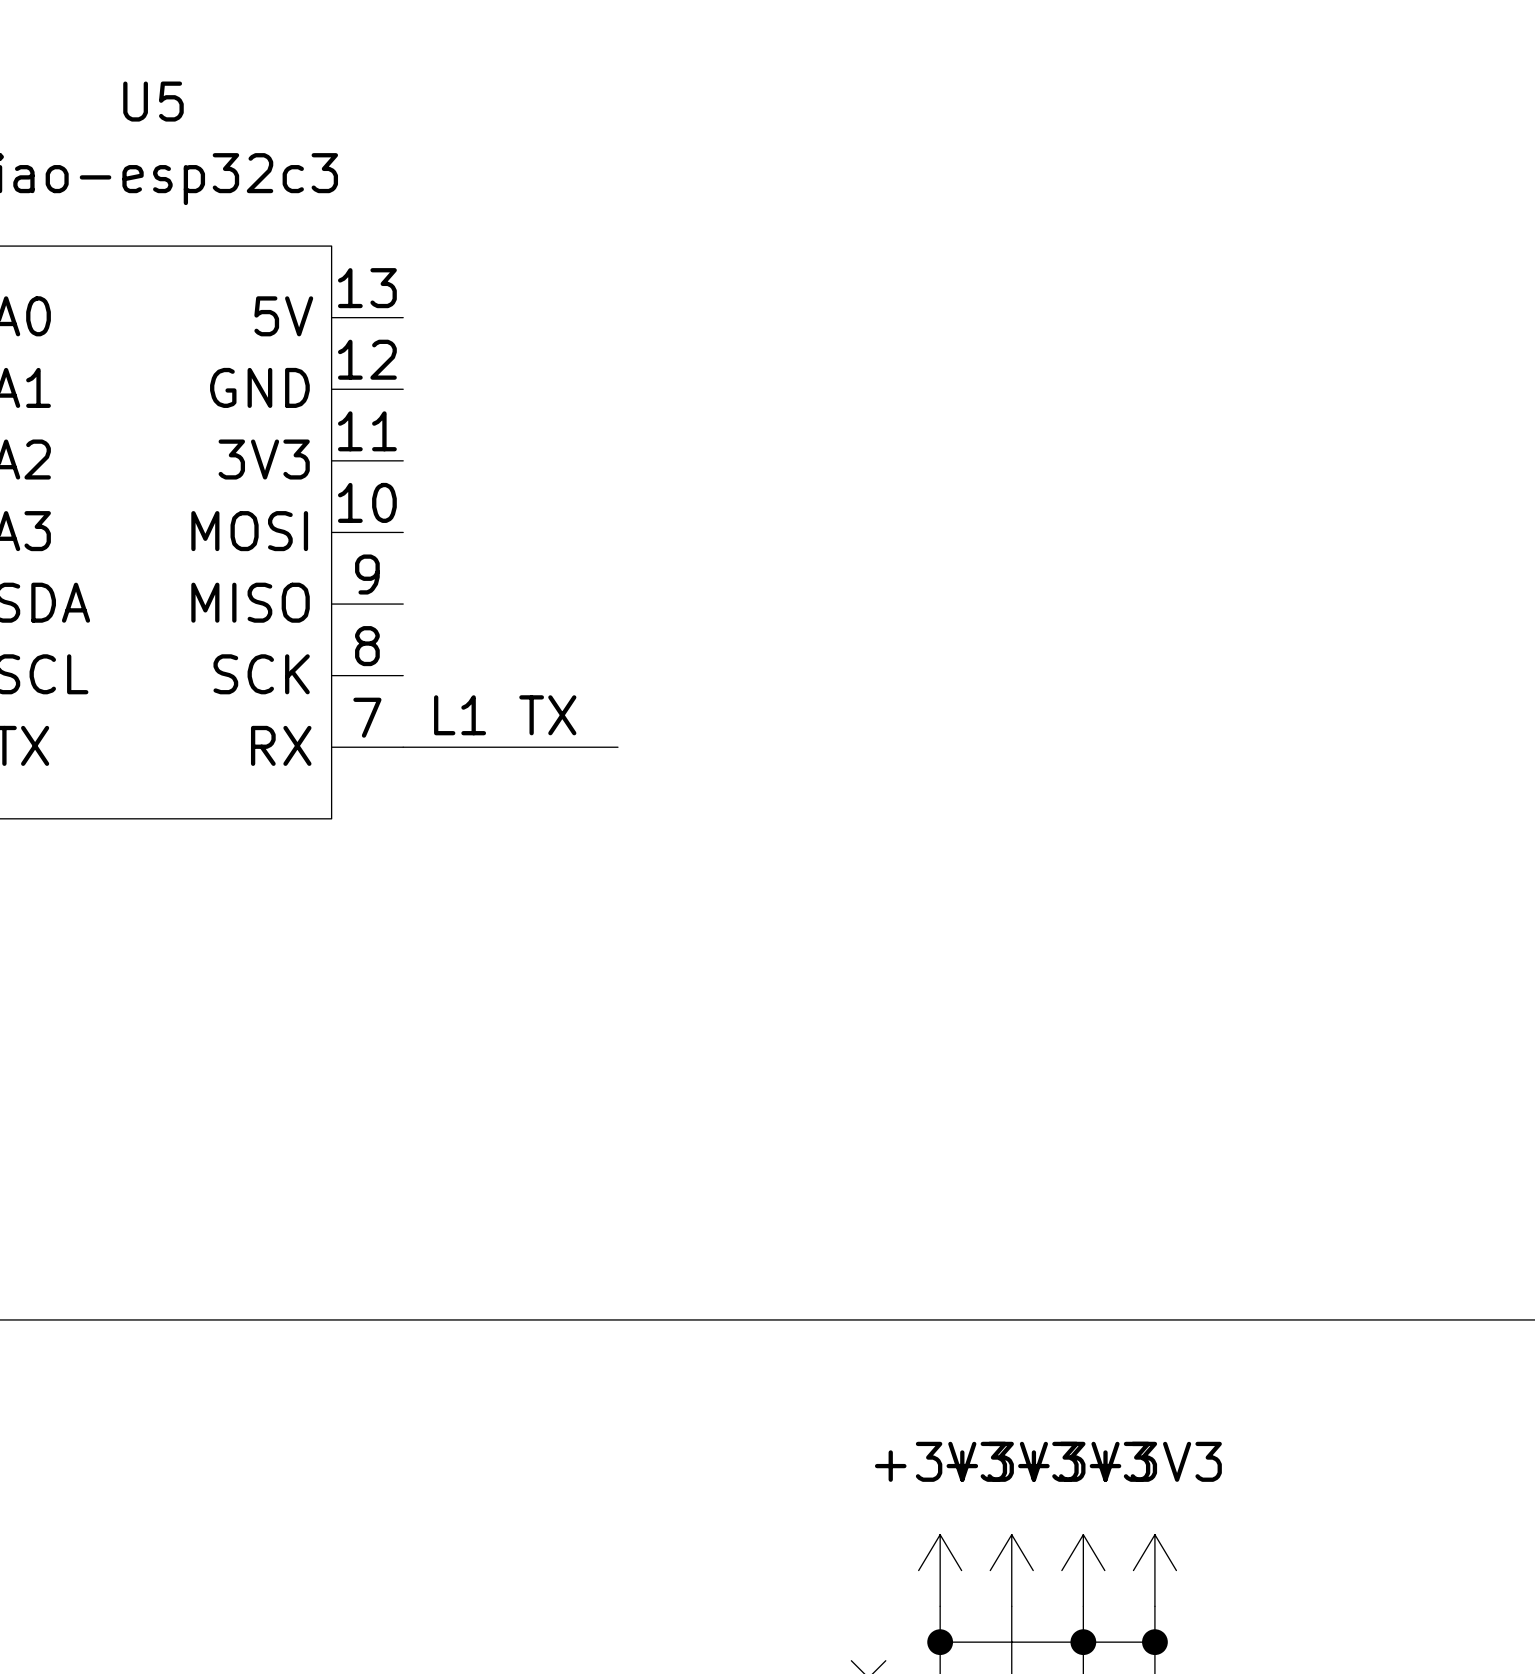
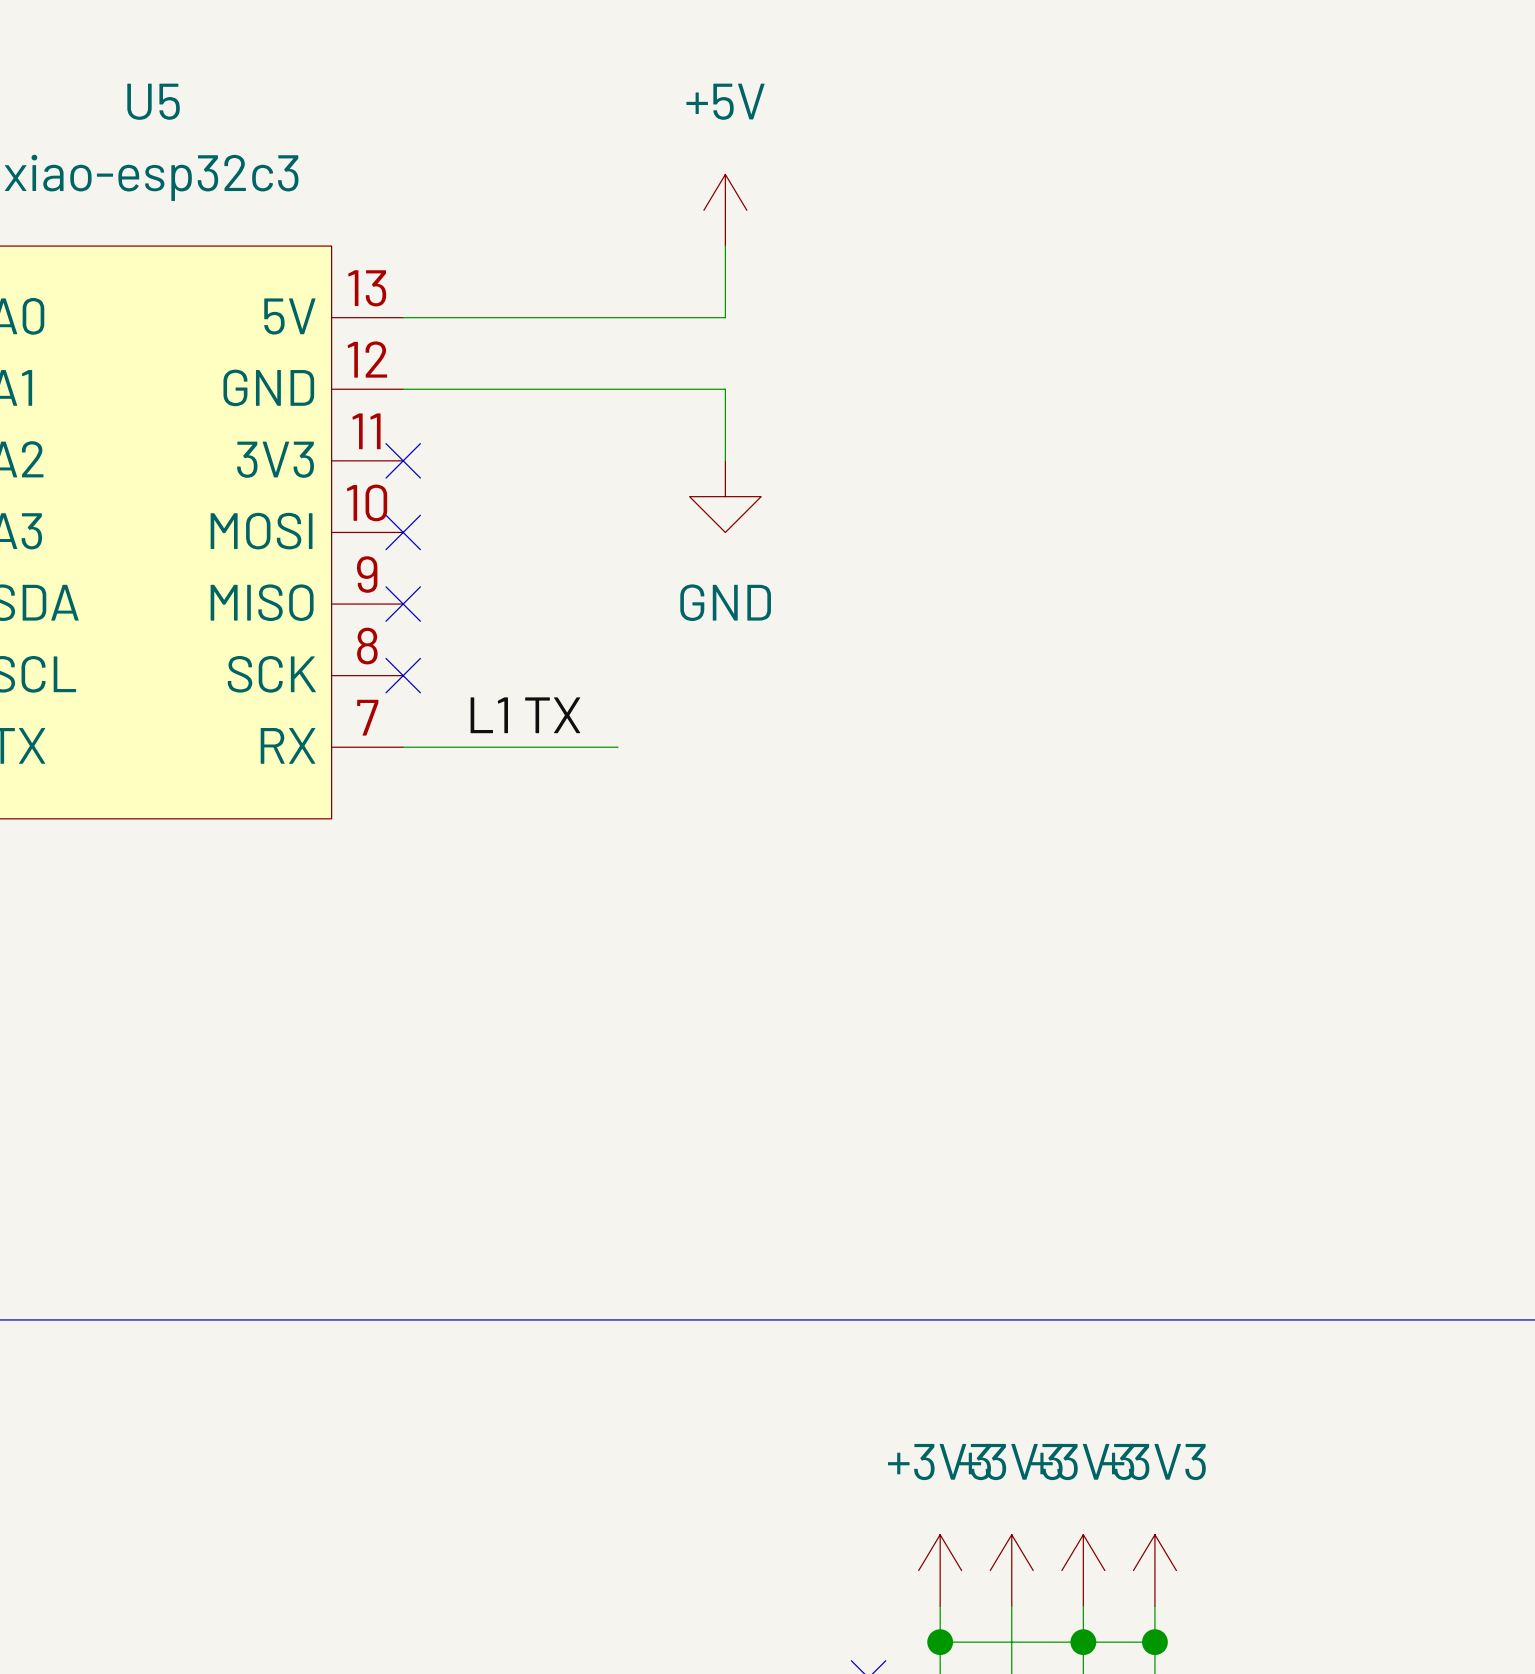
power symbol: none -> +5V (725, 210)
wire: none -> (725, 246) (725, 317) (403, 317)
wire: none -> (403, 389) (725, 389) (725, 460)
no-connect mark: none -> (403, 460)
power symbol: none -> GND (725, 496)
no-connect mark: none -> (403, 532)
no-connect mark: none -> (403, 604)
no-connect mark: none -> (403, 675)

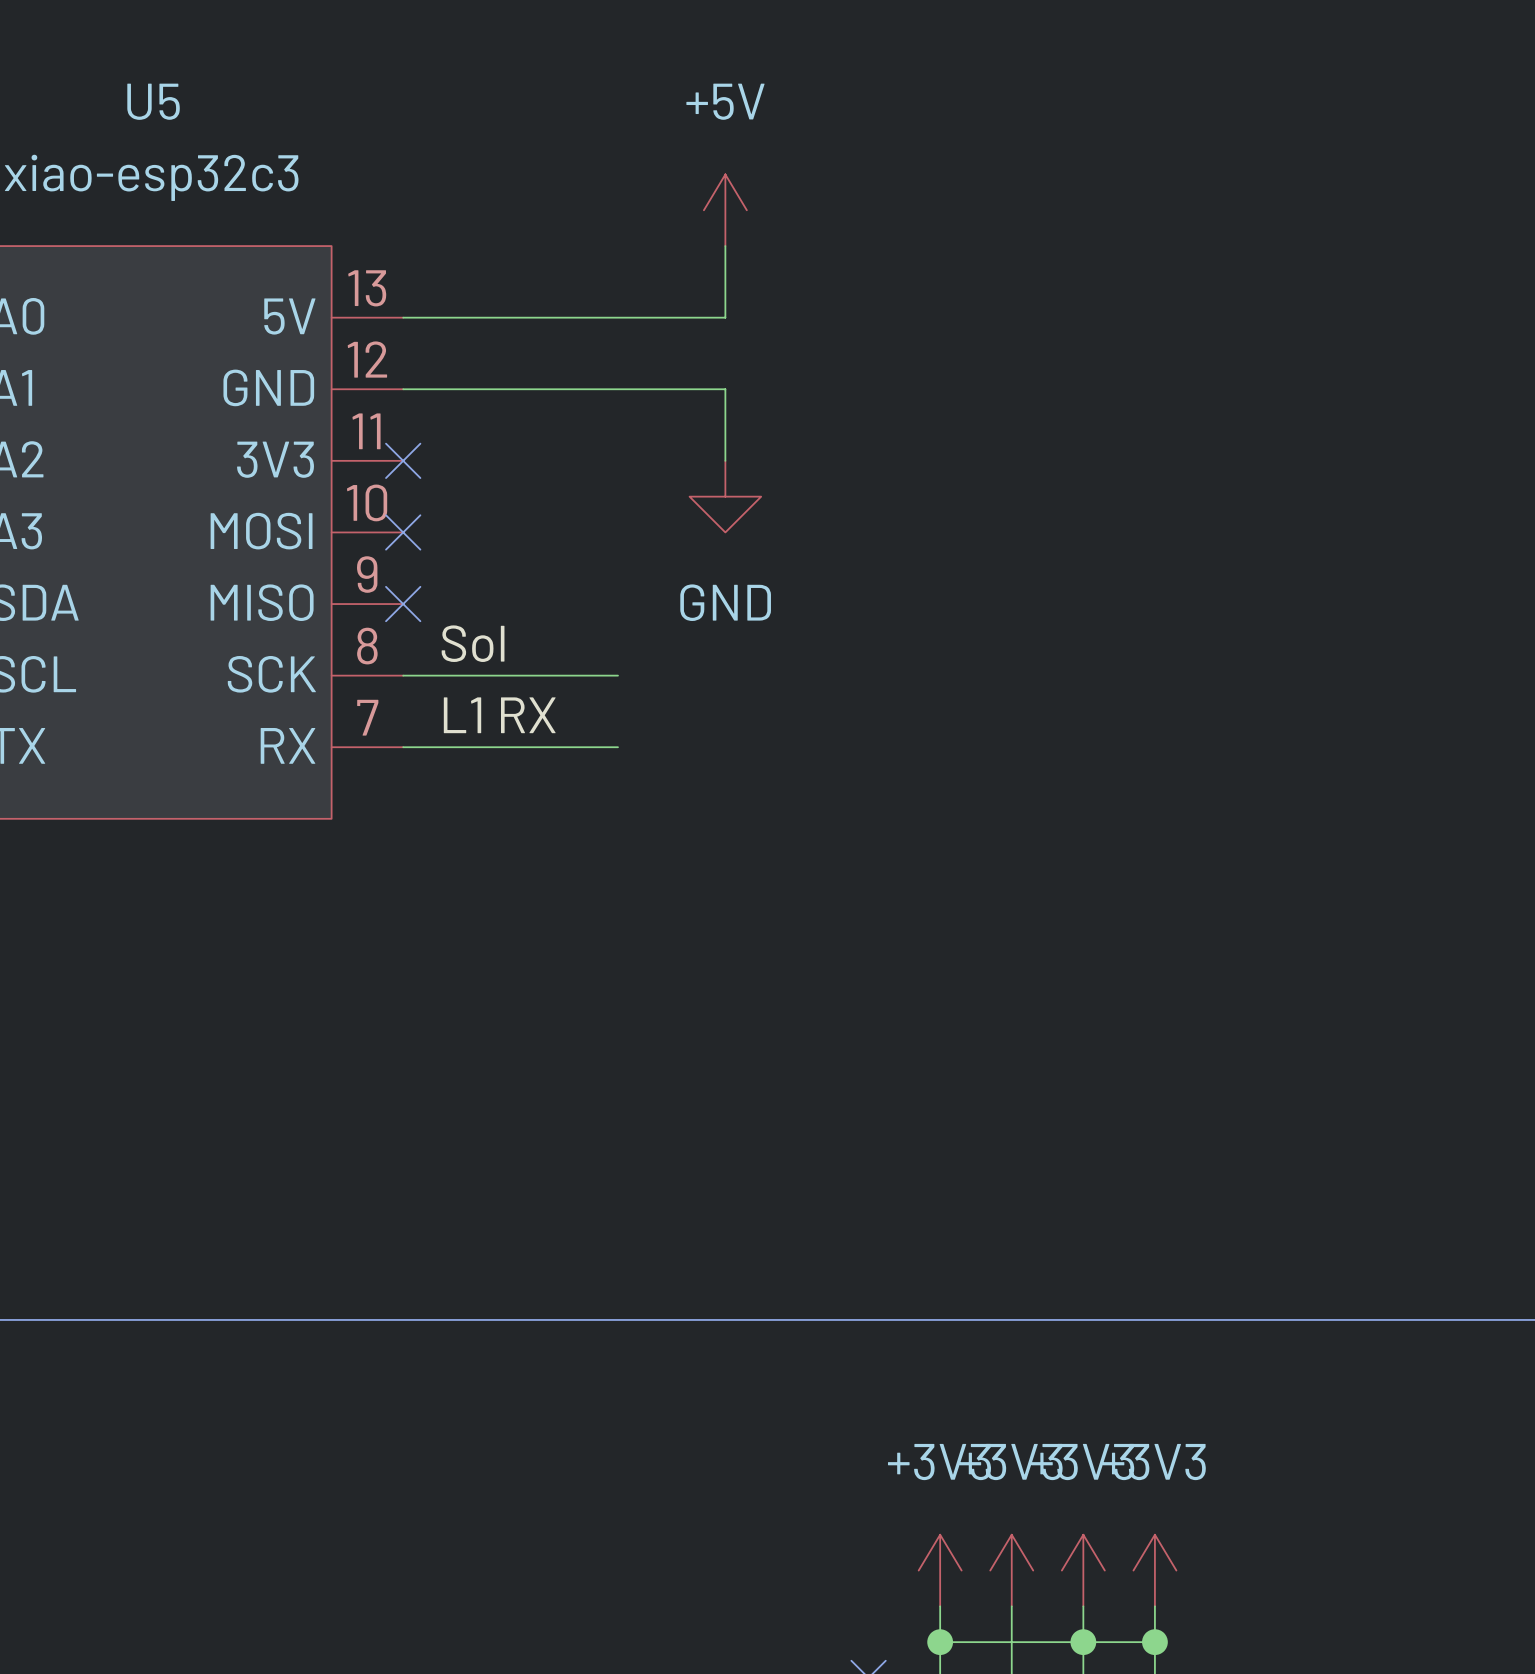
label: none -> Sol (473, 643)
wire: none -> (403, 675) (617, 675)
no-connect mark: (403, 675) -> none
label: L1 TX (525, 715) -> L1 RX (499, 715)

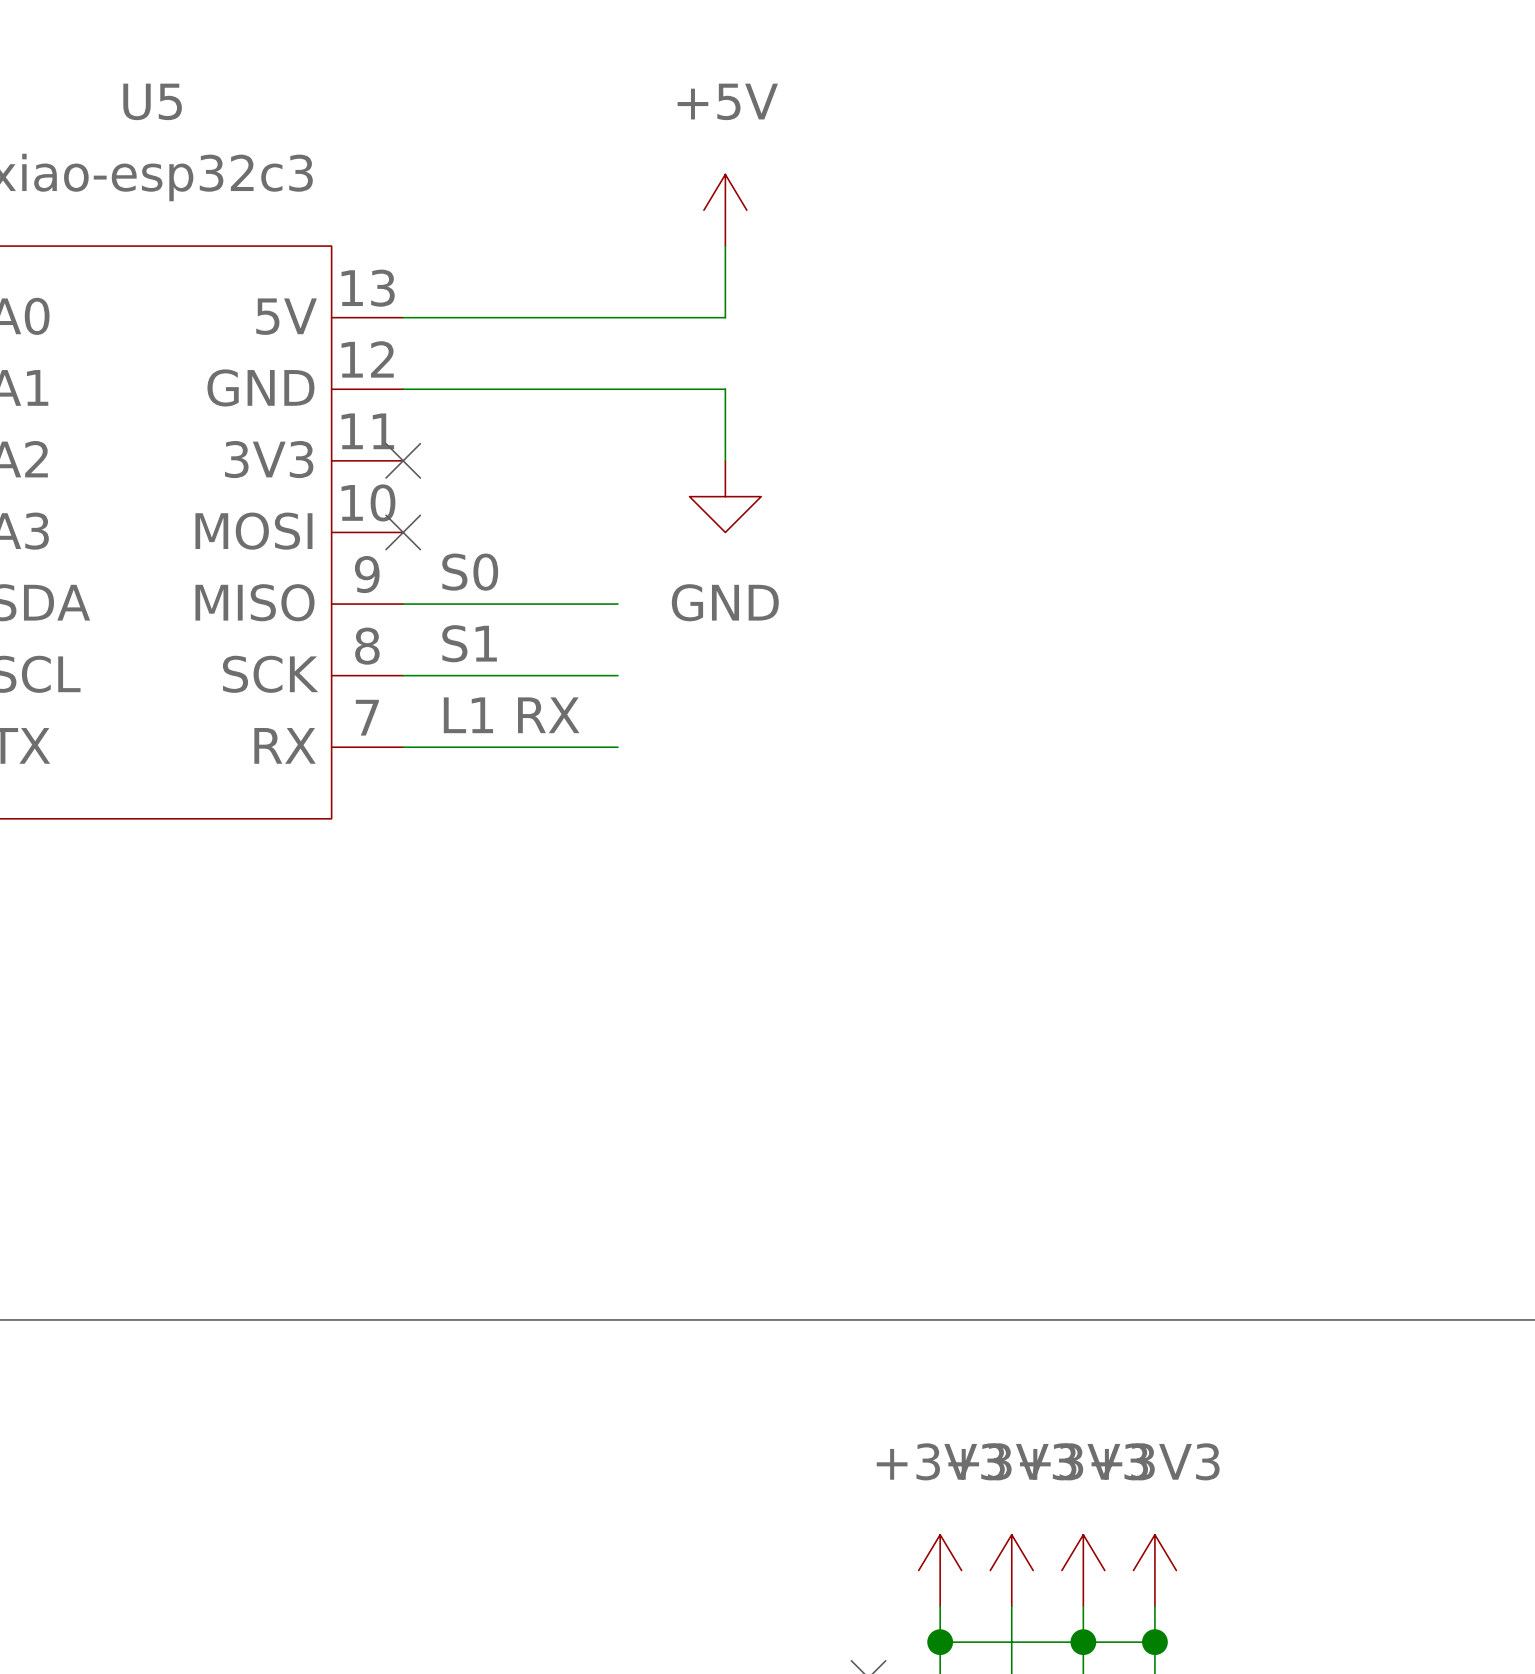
label: none -> S0 (470, 572)
wire: none -> (403, 604) (617, 604)
no-connect mark: (403, 604) -> none
label: Sol (473, 643) -> S1 (469, 643)

